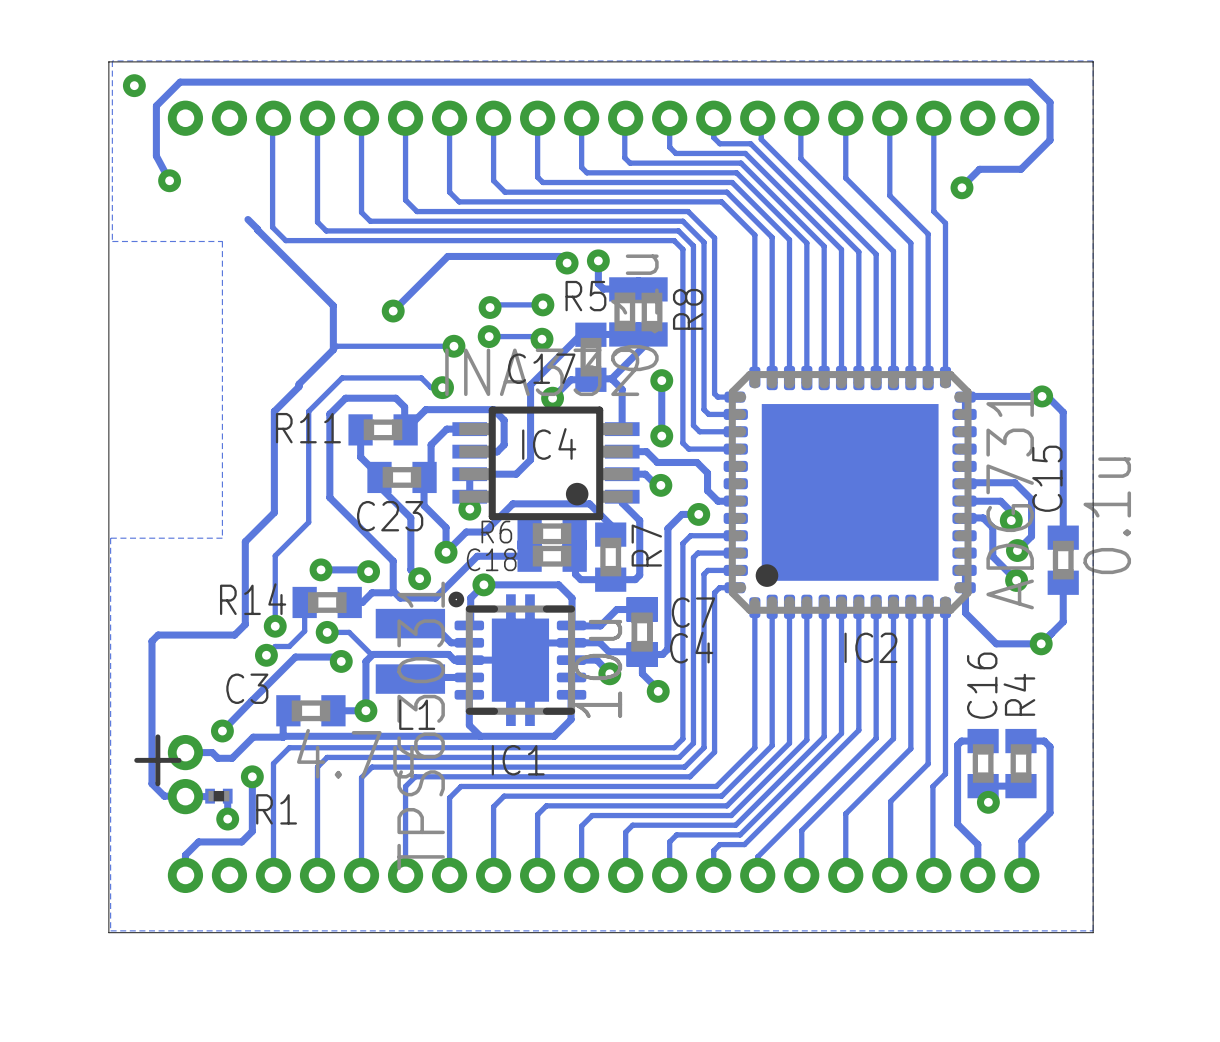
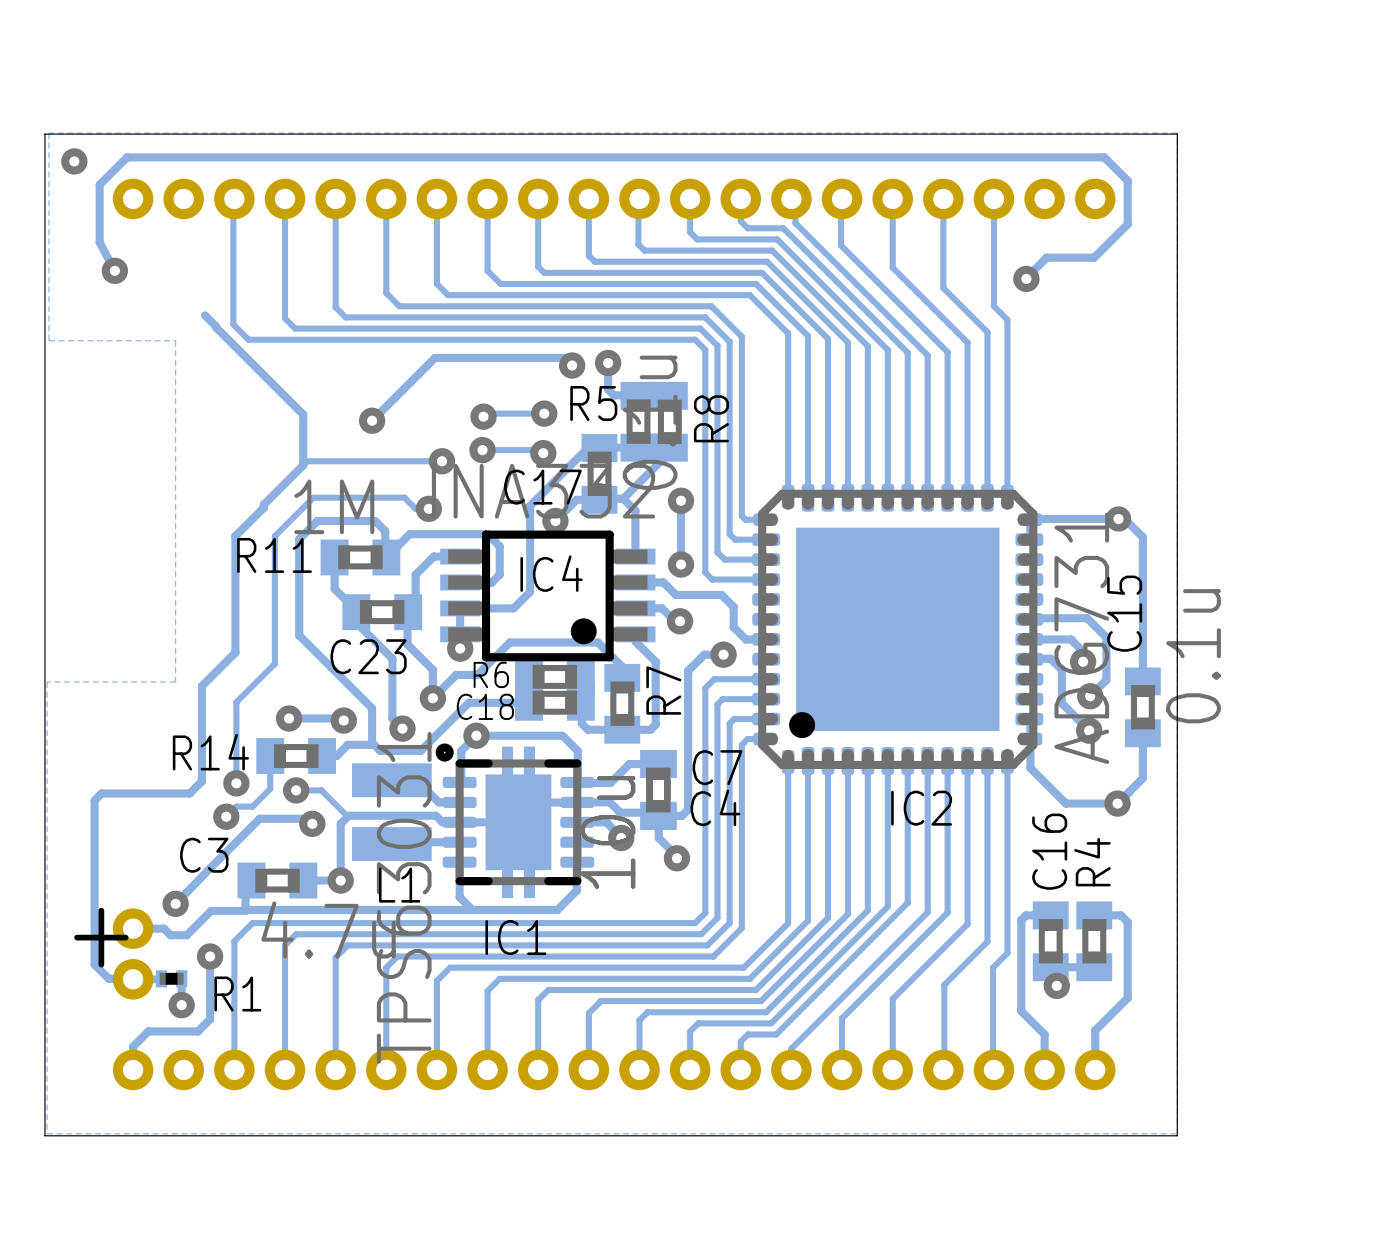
R11 value: none -> 1M (334, 506)

